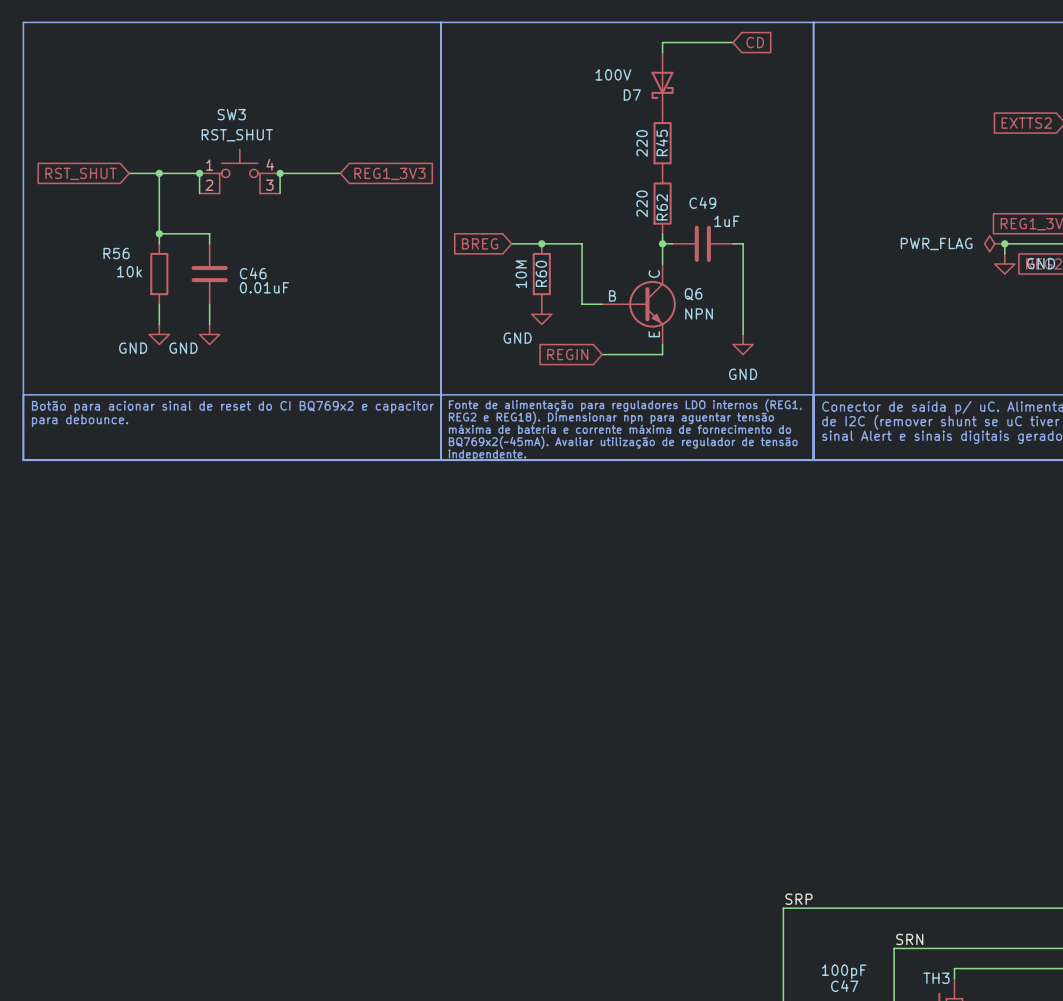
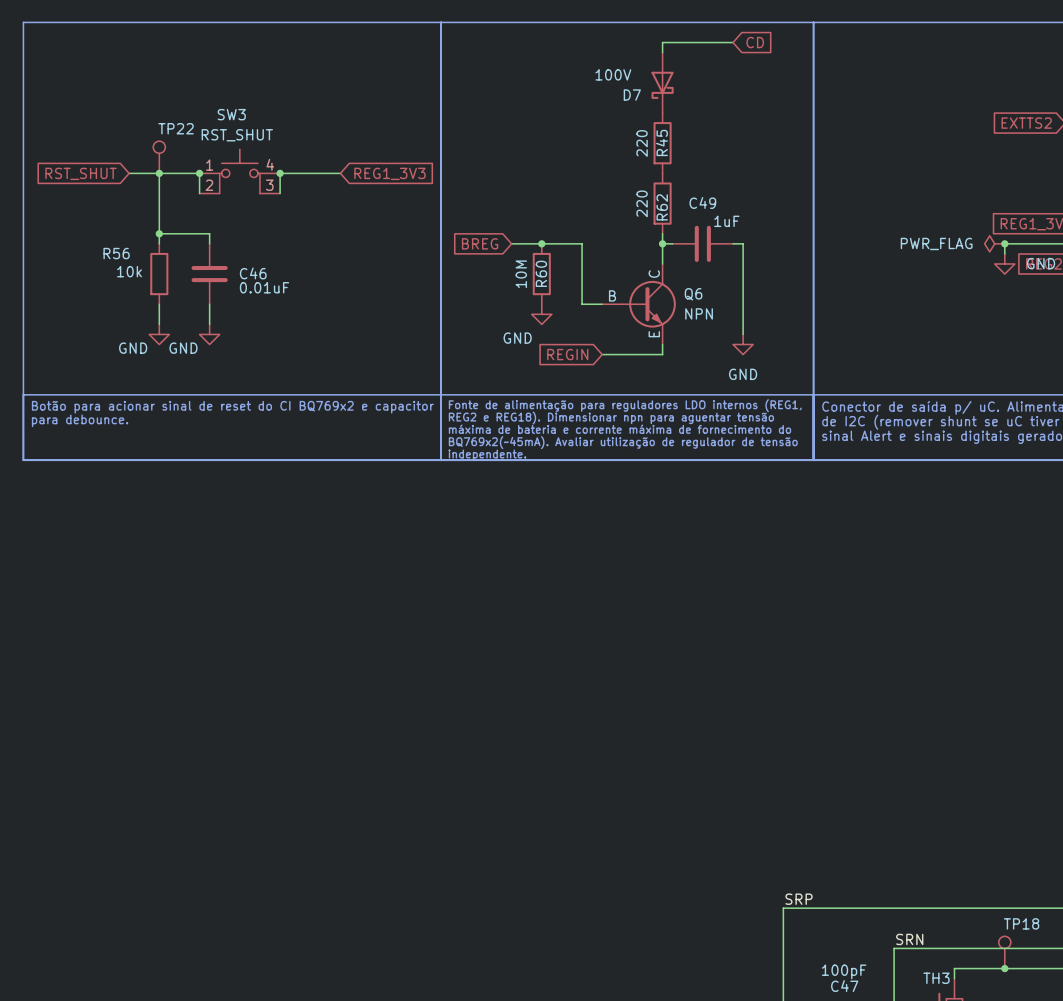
TP22: none -> (159, 157)
TP18: none -> (1004, 952)
junction: none -> (1004, 968)

